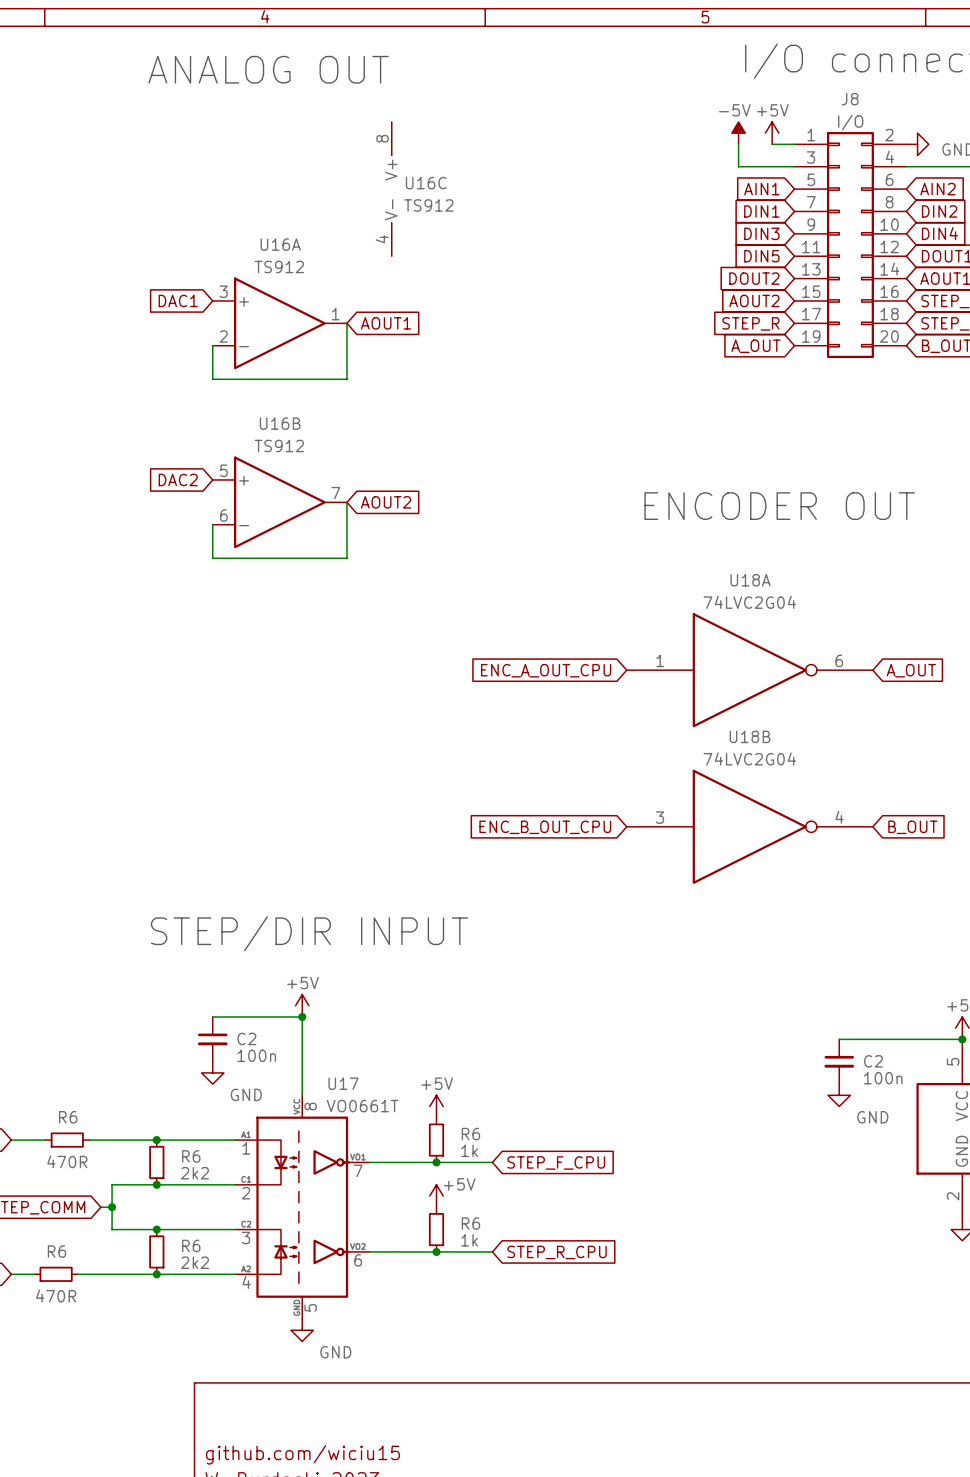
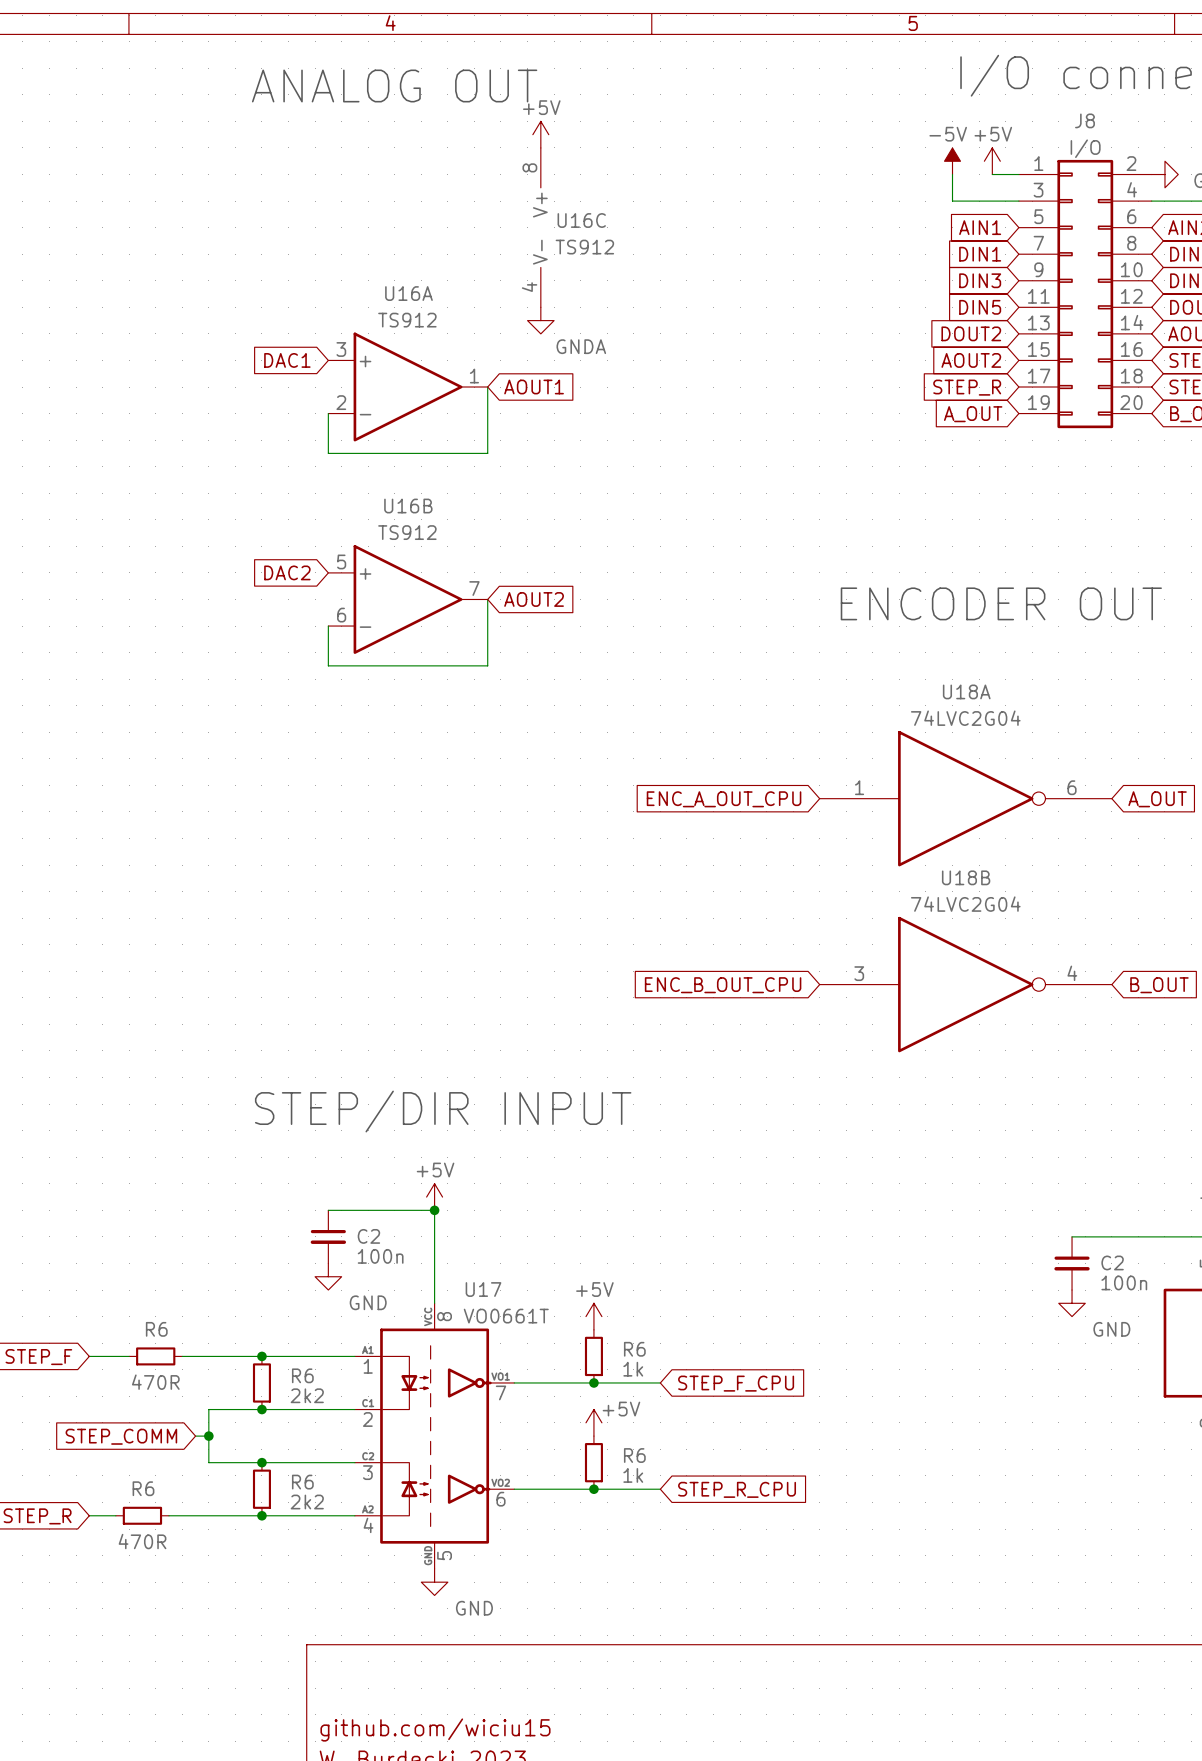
power symbol: none -> +5V (540, 134)
power symbol: none -> GNDA (540, 320)

